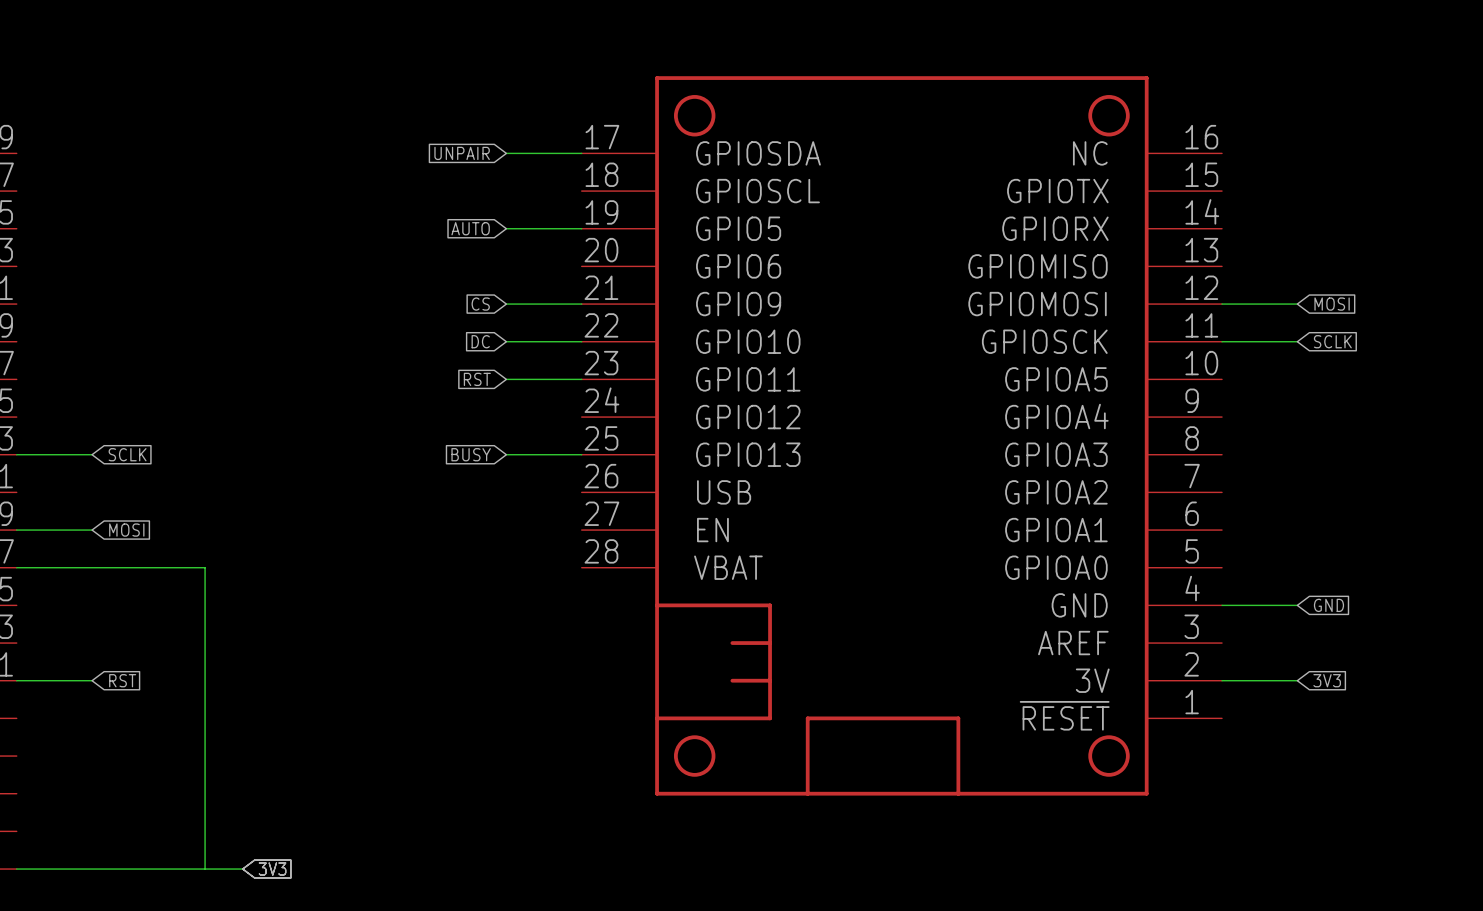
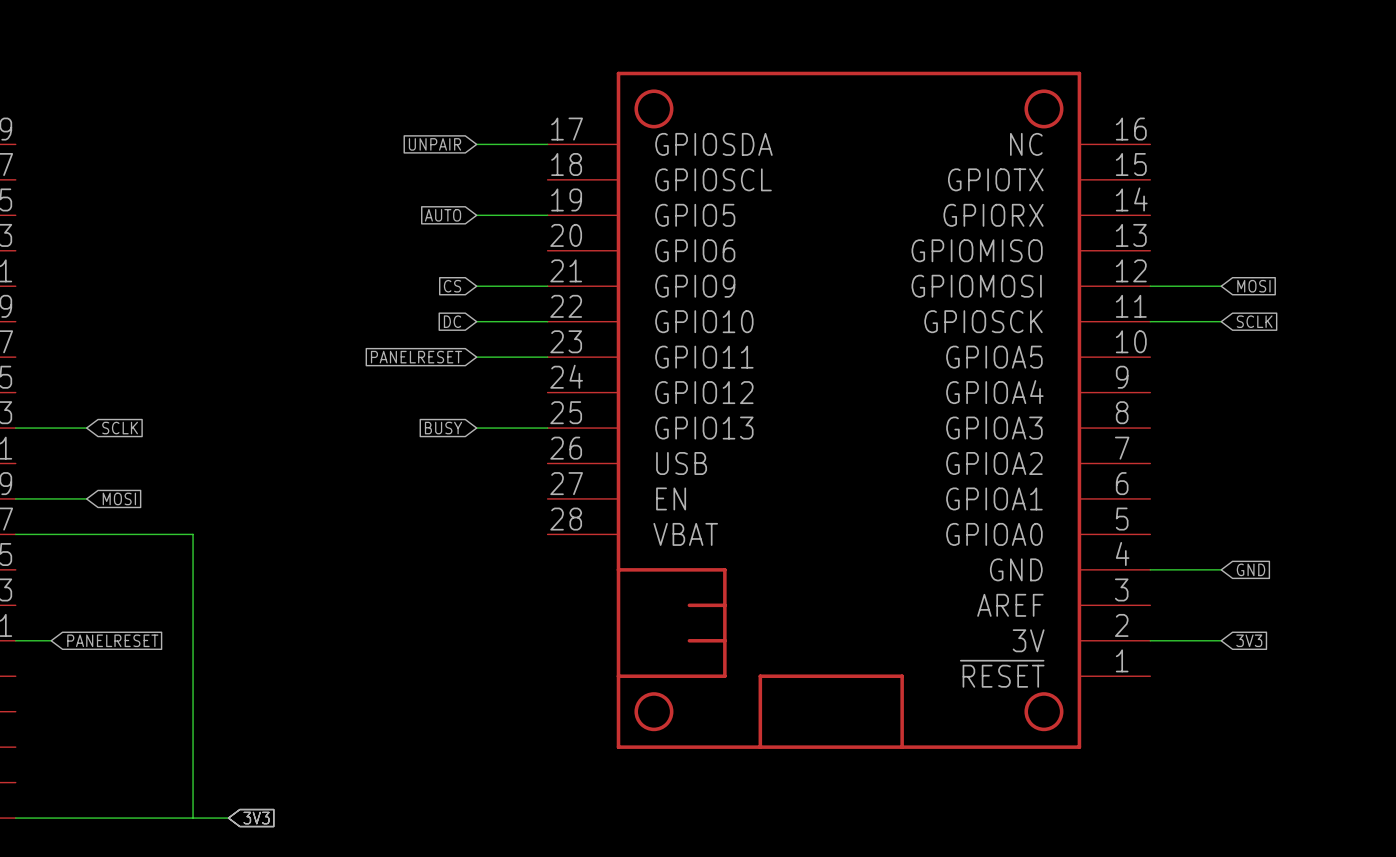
global label: RST (477, 379) -> PANELRESET (416, 357)
wire: (54, 680) (92, 680) -> none
global label: none -> PANELRESET (112, 640)
global label: RST (122, 680) -> none

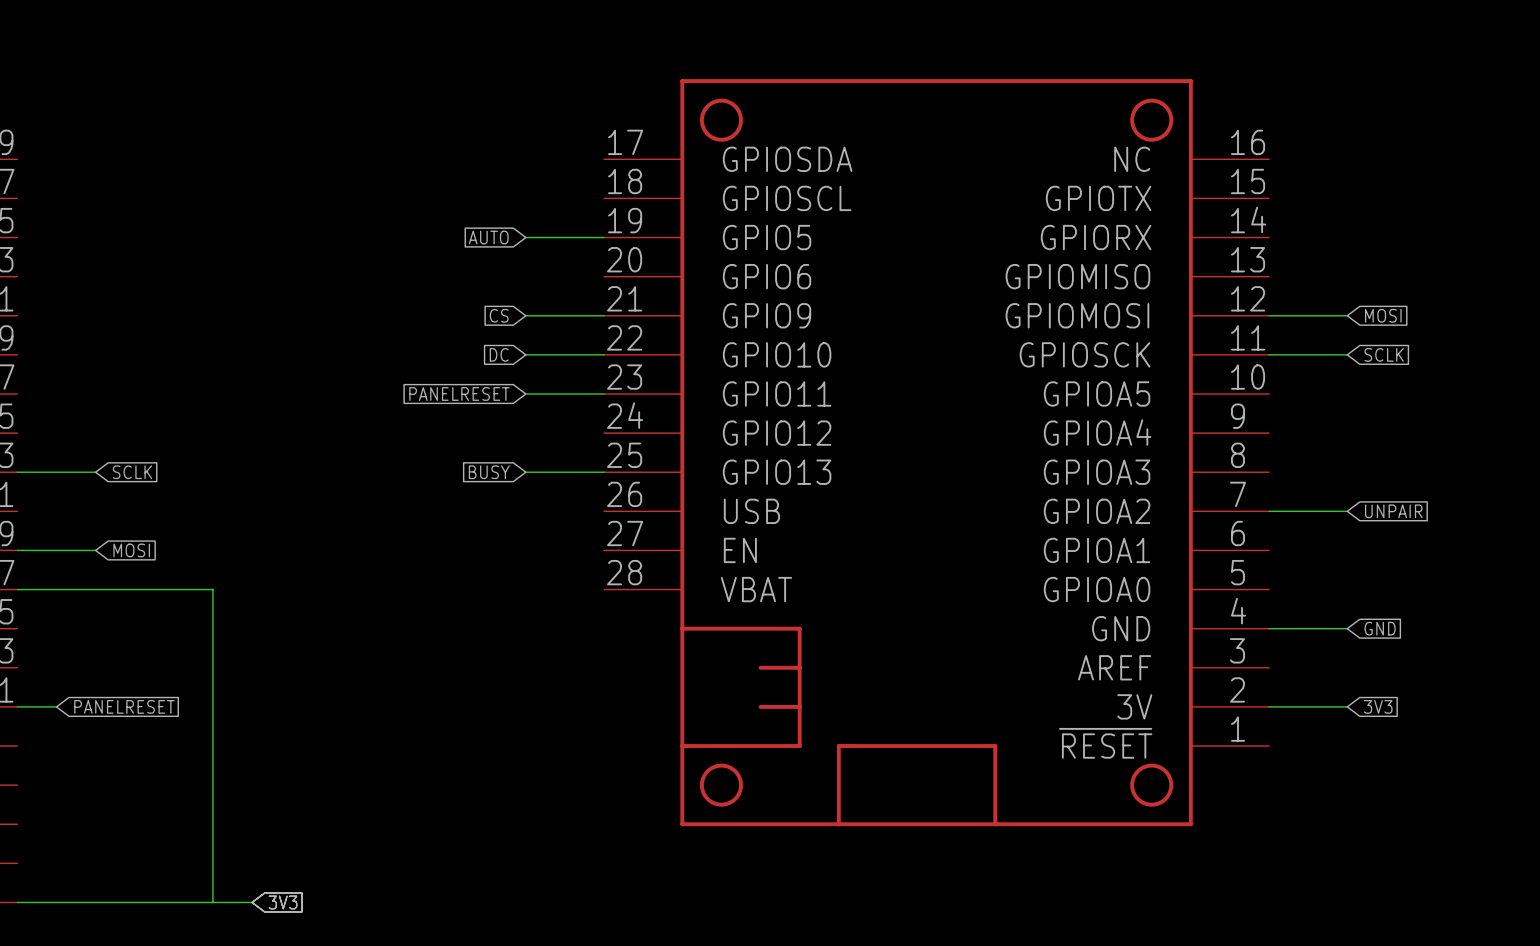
global label: UNPAIR (434, 144) -> none
wire: (476, 144) (547, 144) -> none
wire: none -> (1269, 511) (1347, 511)
global label: none -> UNPAIR (1393, 511)

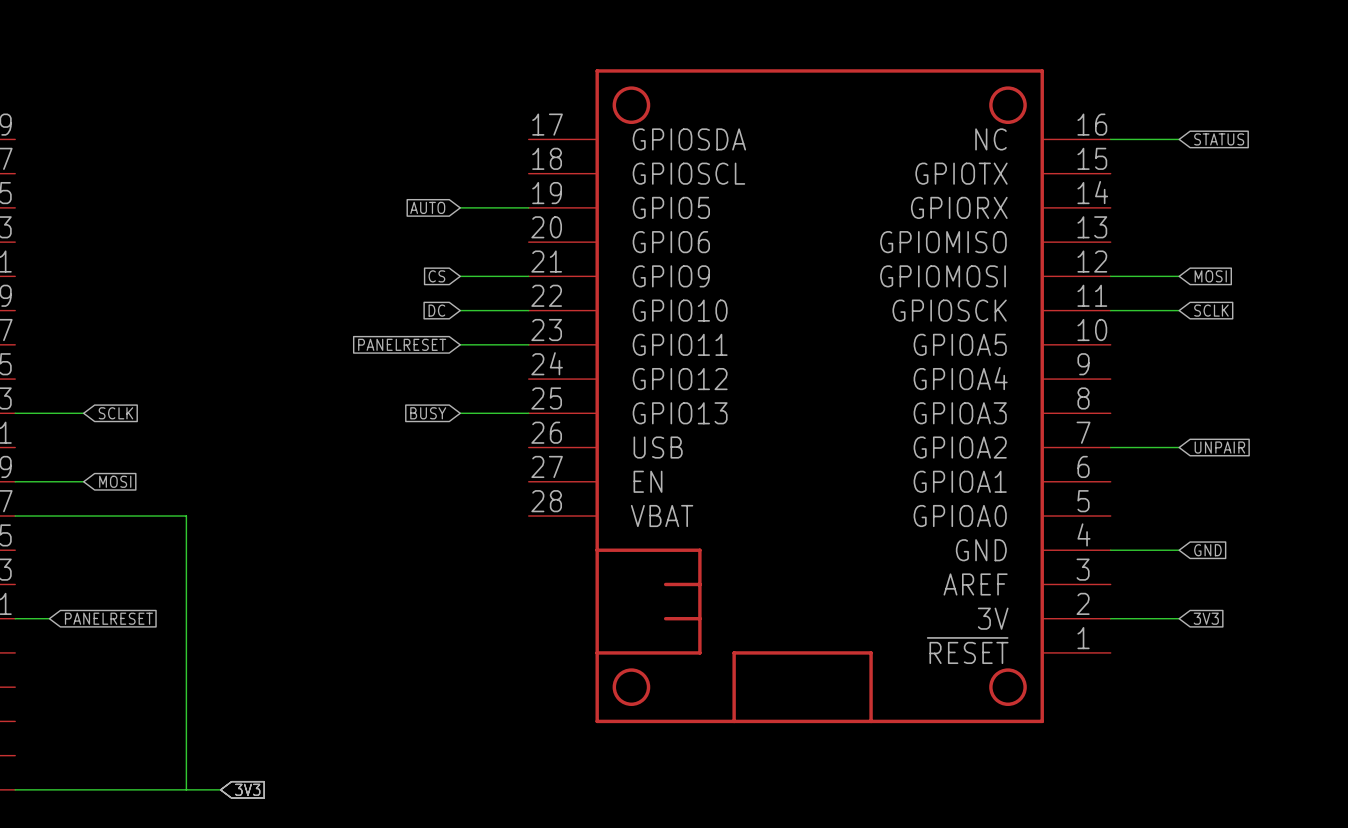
wire: none -> (1110, 139) (1179, 139)
global label: none -> STATUS (1219, 139)

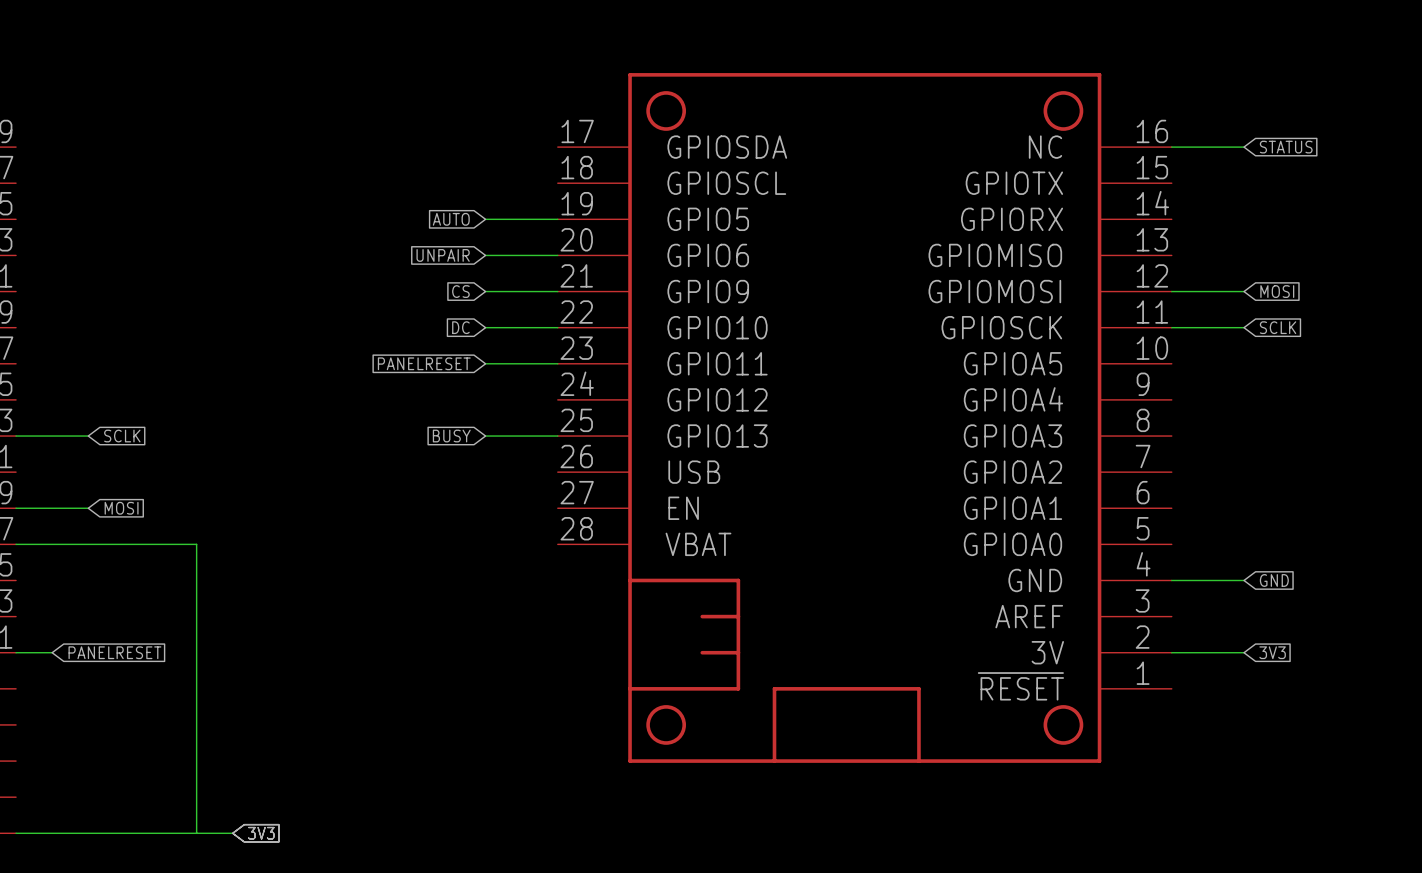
global label: none -> UNPAIR (443, 255)
wire: none -> (485, 255) (557, 255)
wire: (1110, 447) (1179, 447) -> none
global label: UNPAIR (1219, 447) -> none

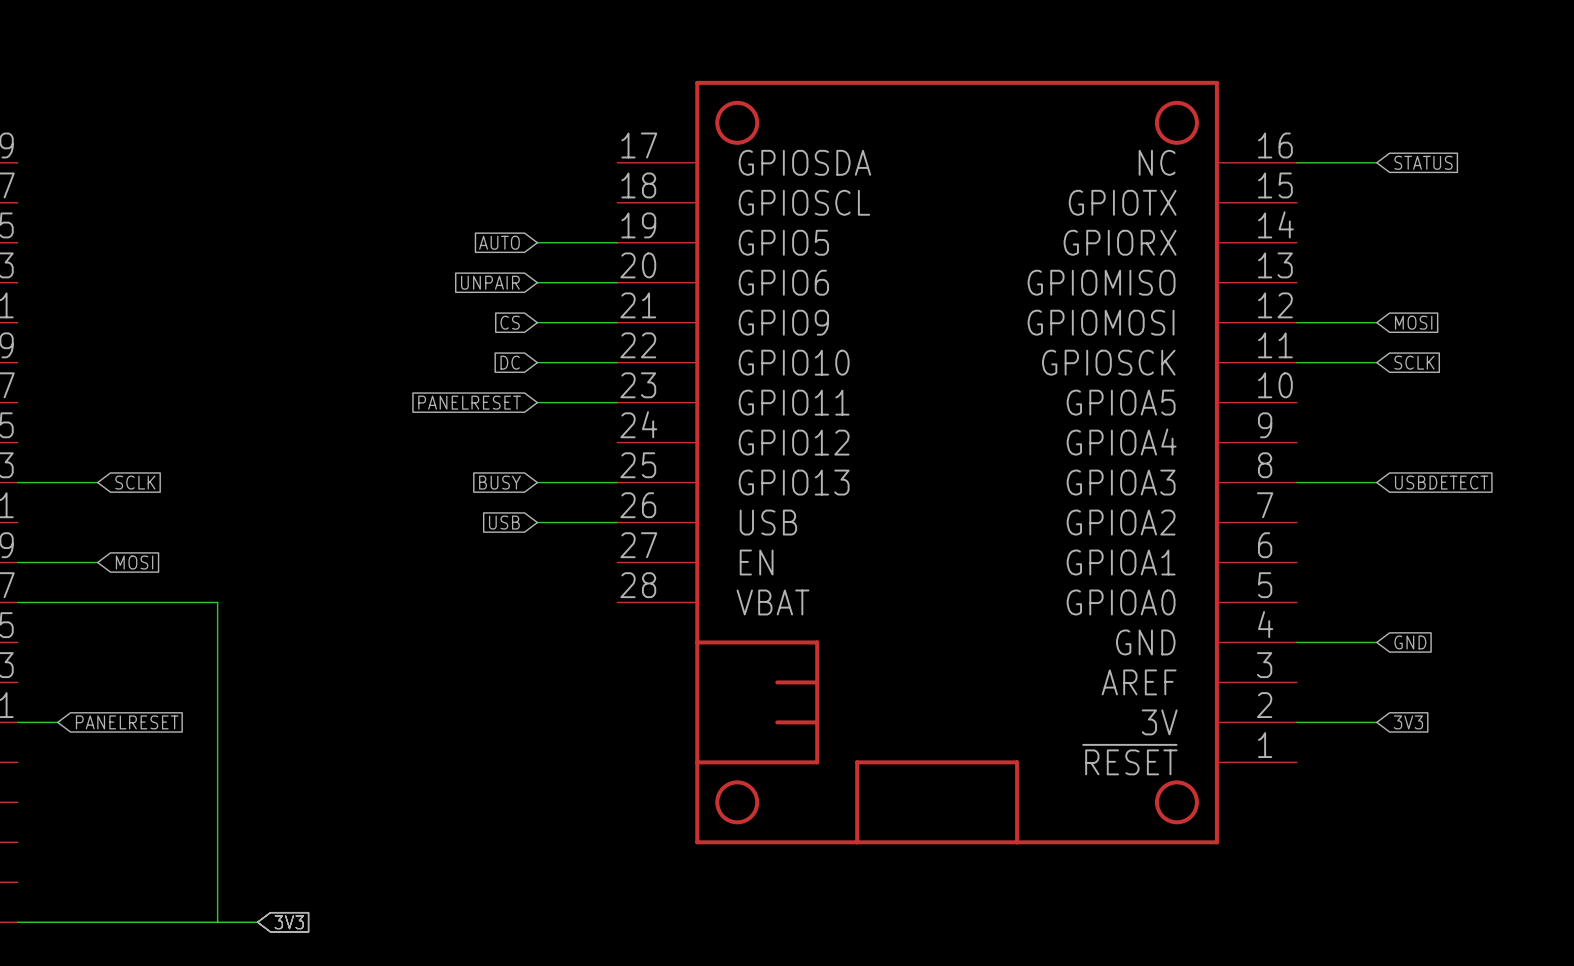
wire: none -> (1296, 482) (1376, 482)
global label: none -> USBDETECT (1441, 482)
global label: none -> USB (504, 522)
wire: none -> (537, 522) (617, 522)

